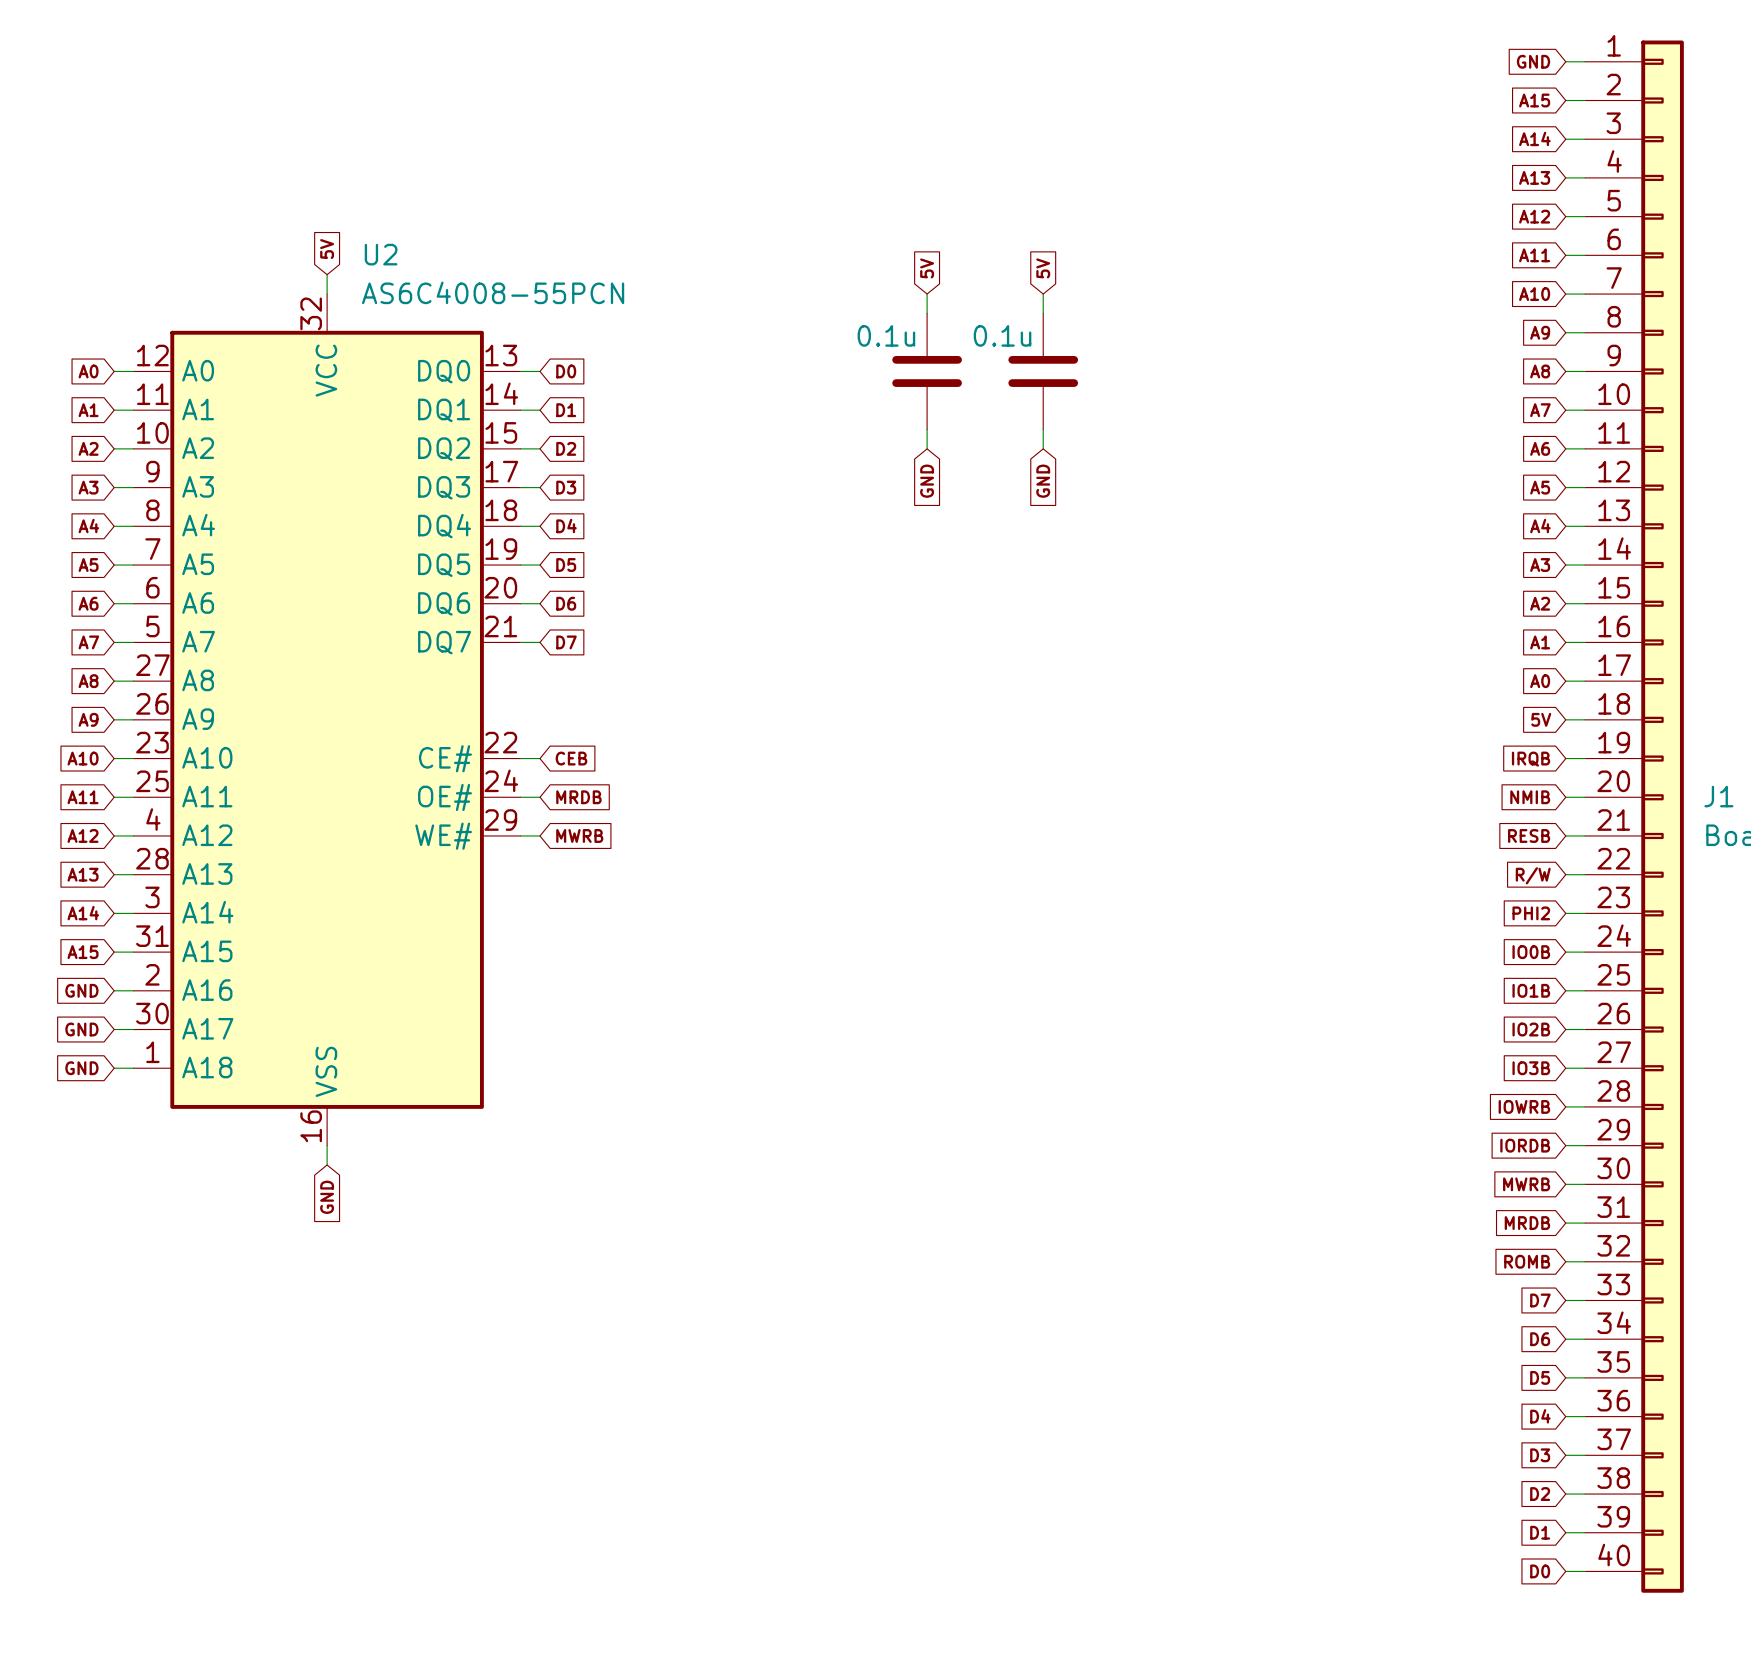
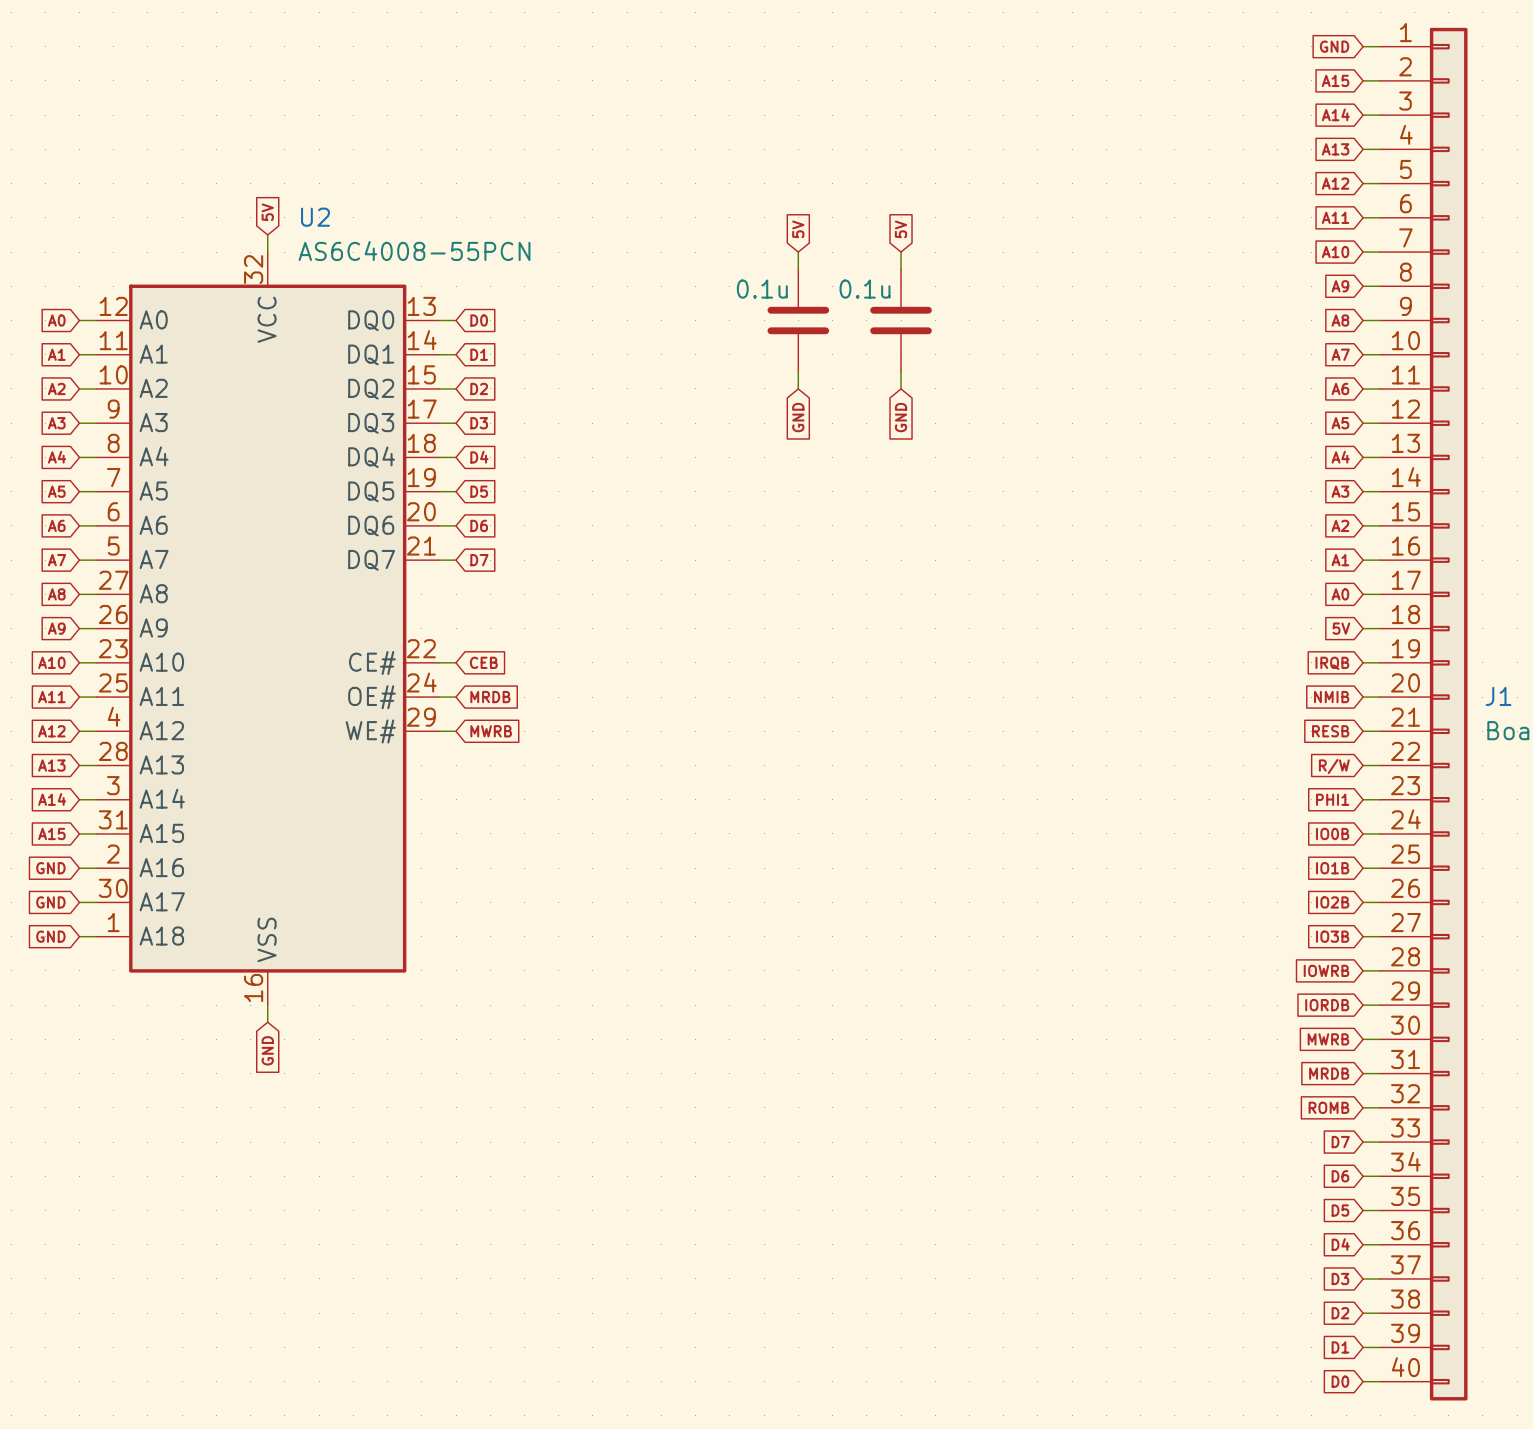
global label: PHI2 (1531, 913) -> PHI1 (1332, 799)

